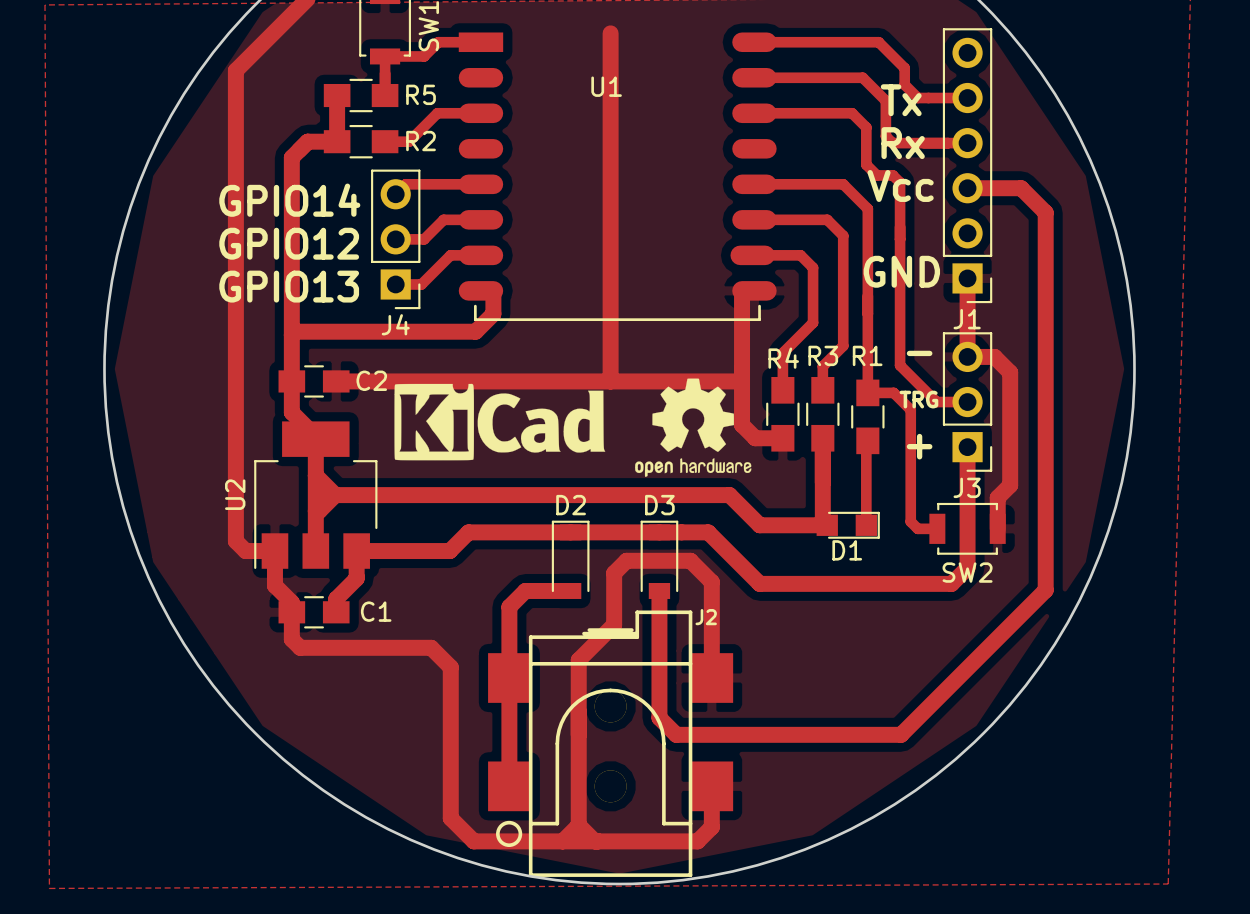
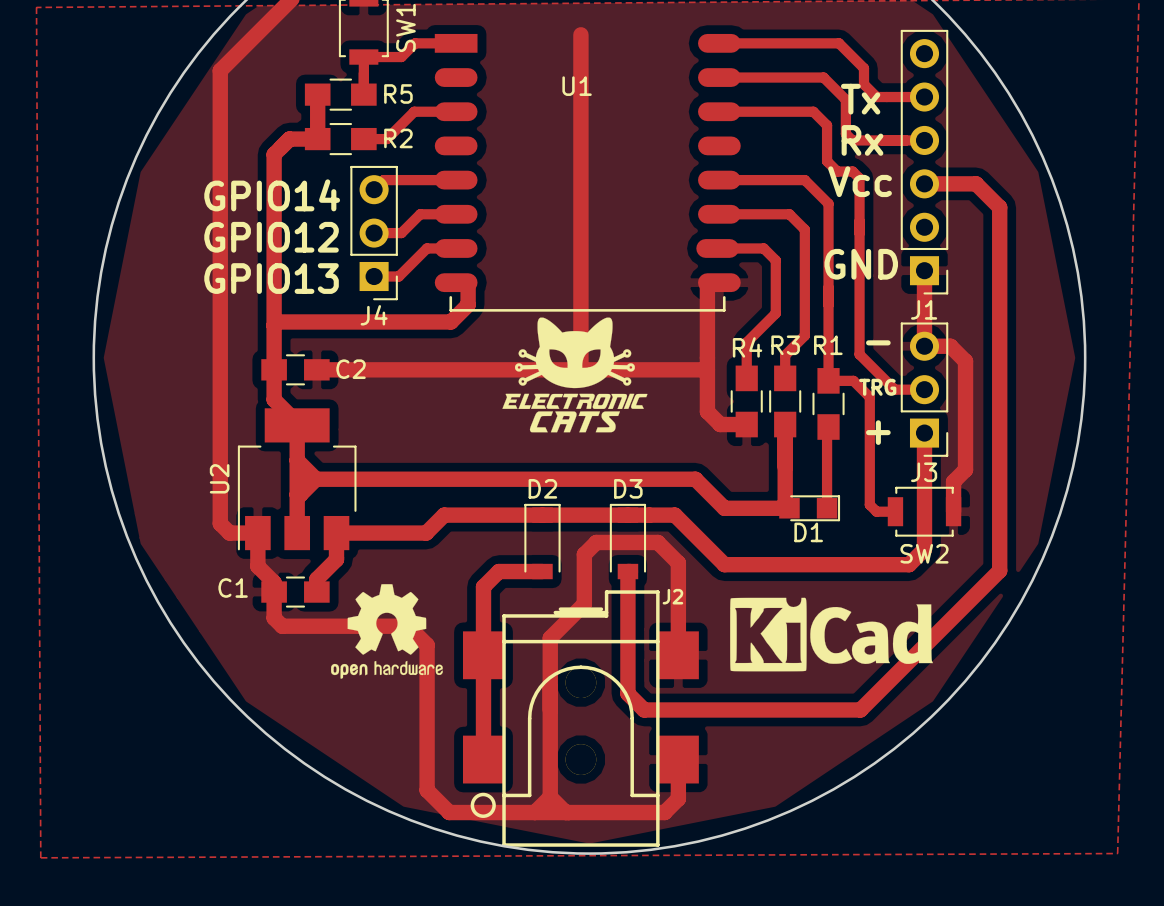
drawing: none -> [502, 317, 648, 433]
drawing position: (499, 422) -> (831, 634)
drawing position: (693, 427) -> (386, 631)
C1 name position: C1 (376, 611) -> C1 (233, 587)

